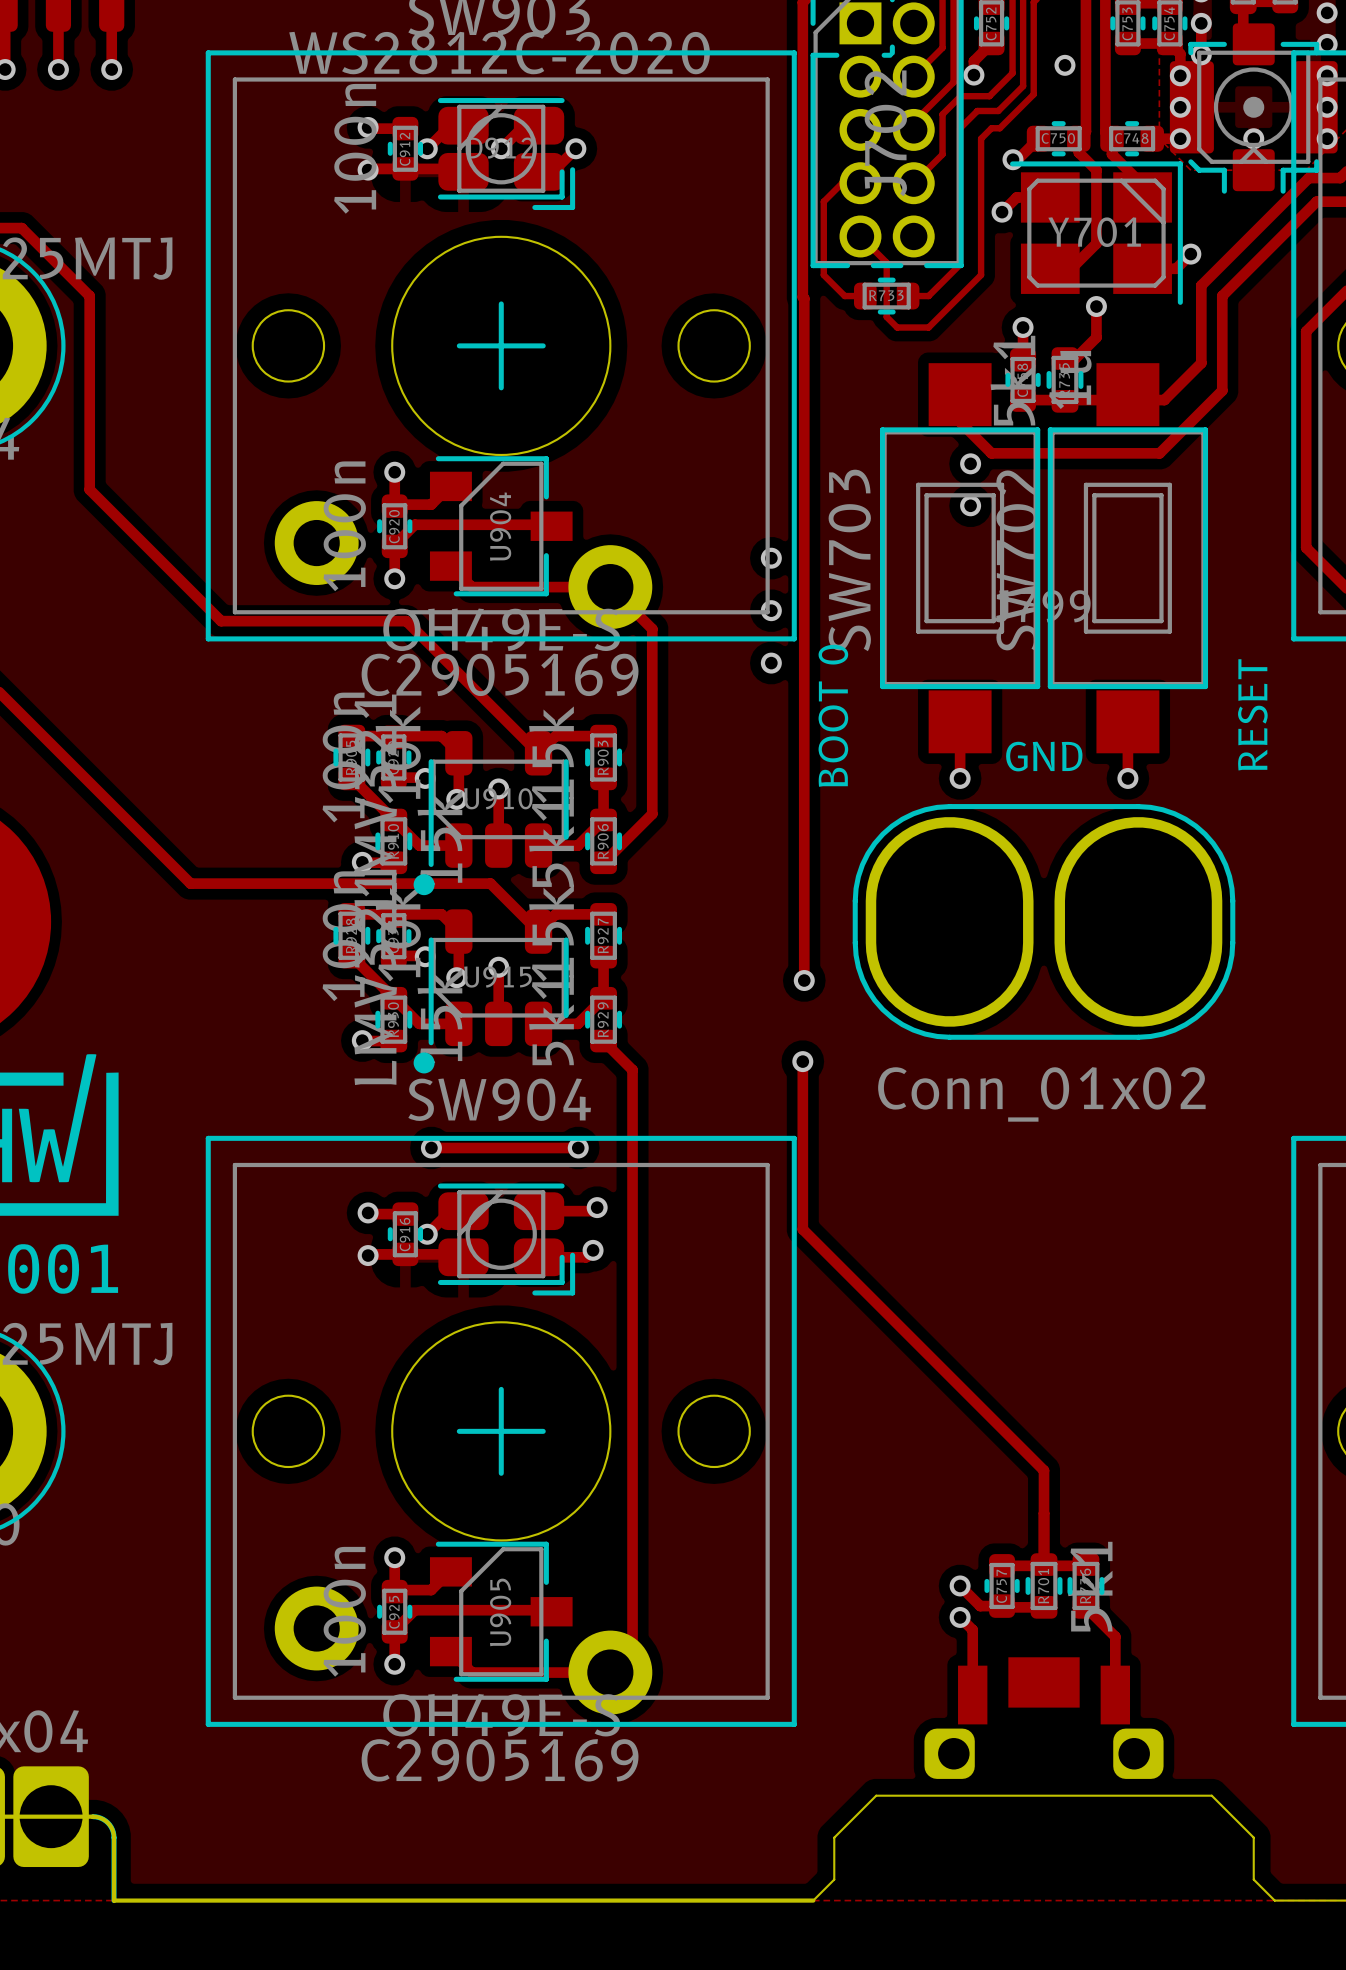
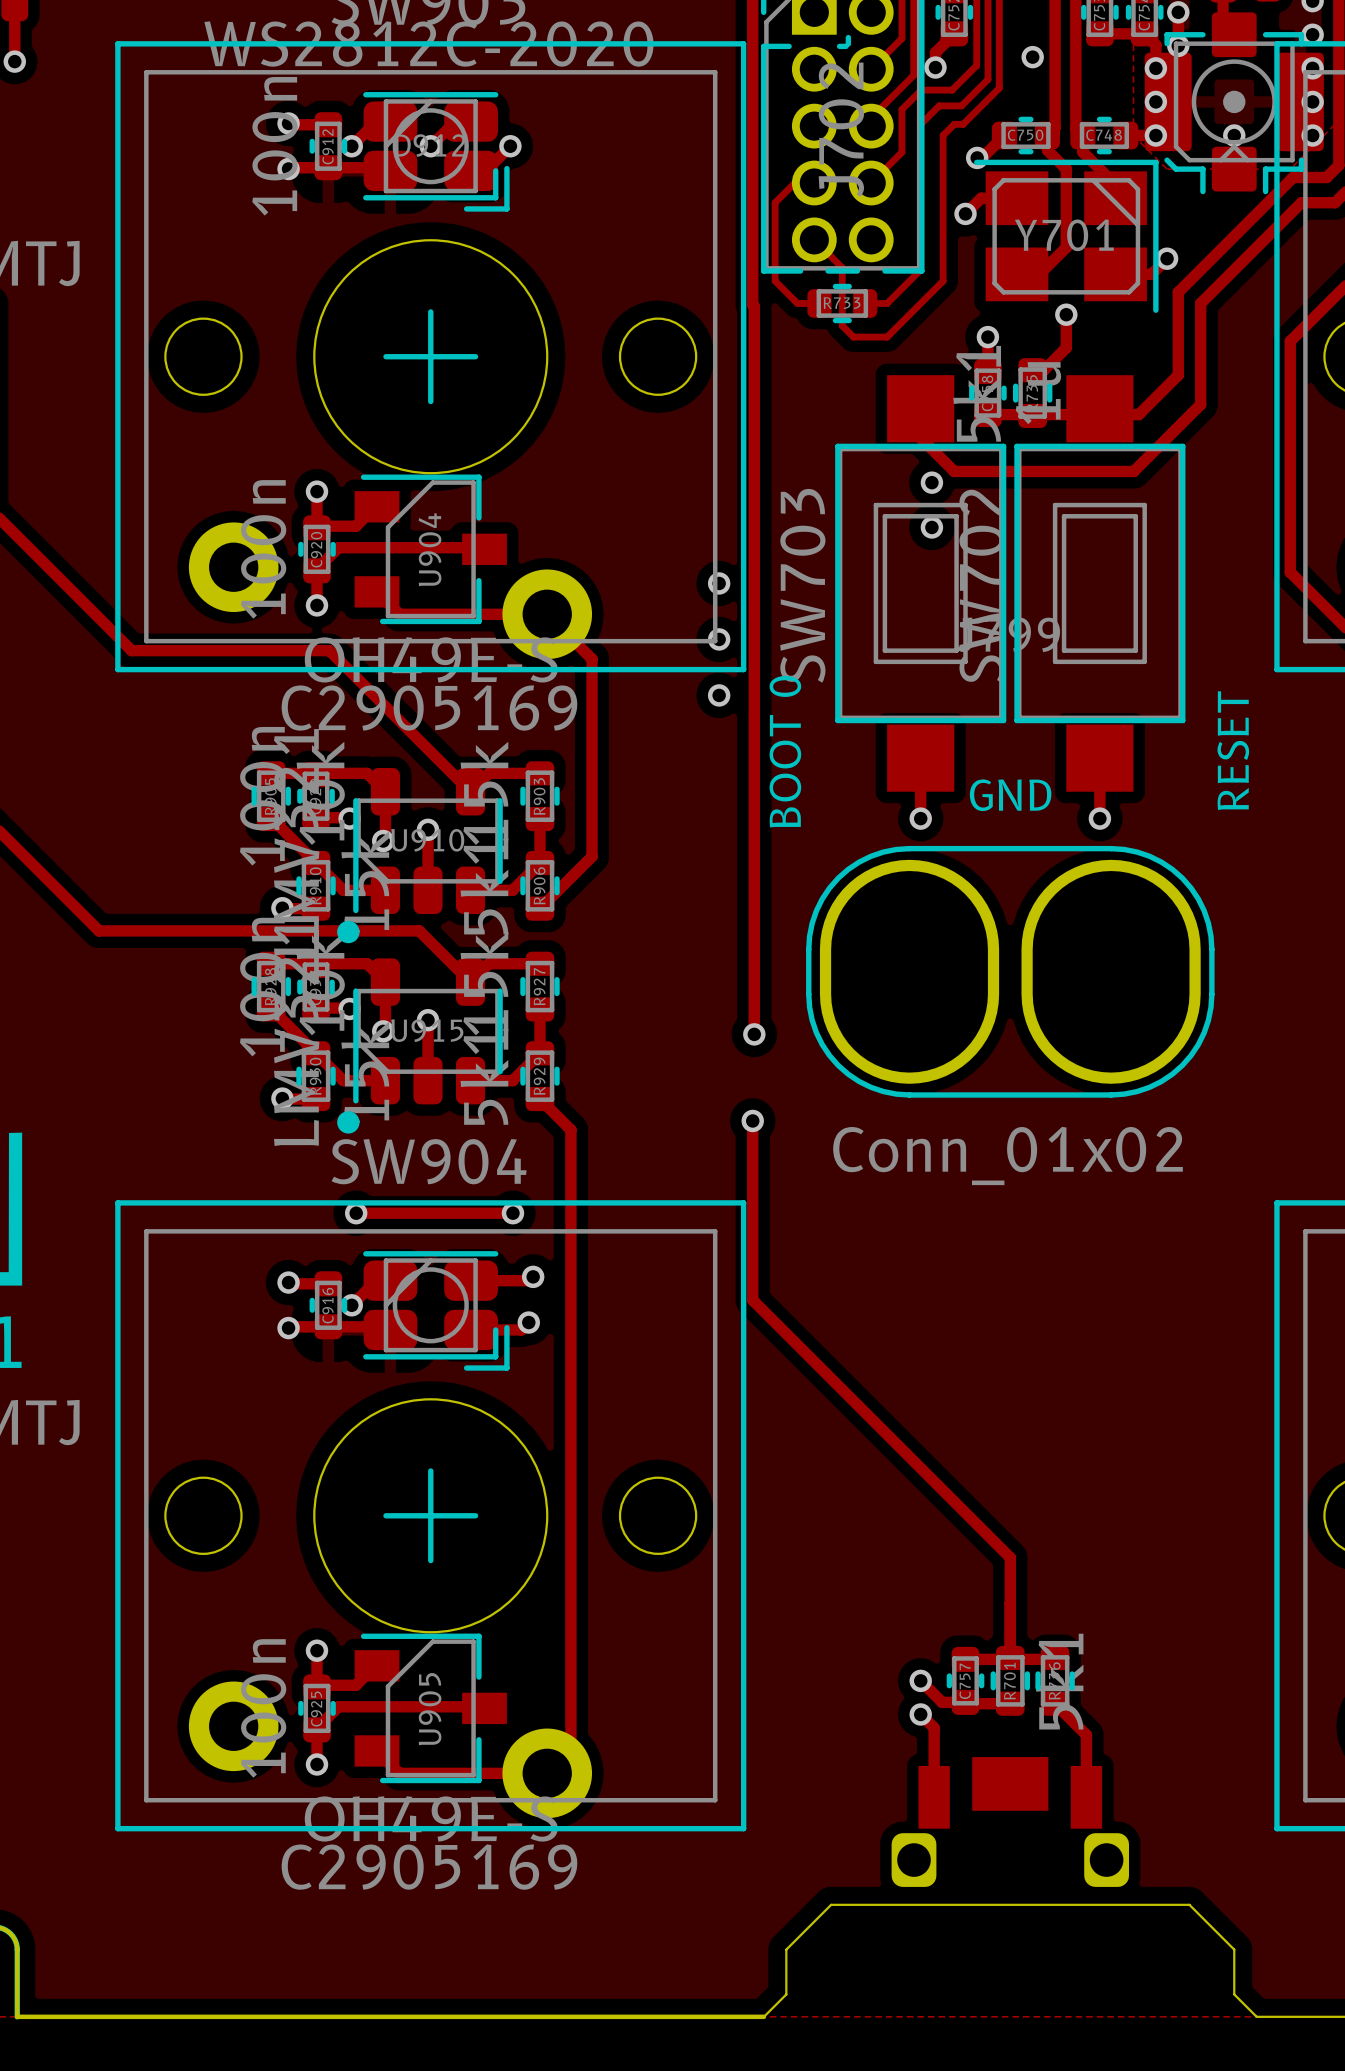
part footprint: [924, 1657, 1164, 1779] -> [891, 1757, 1130, 1887]

